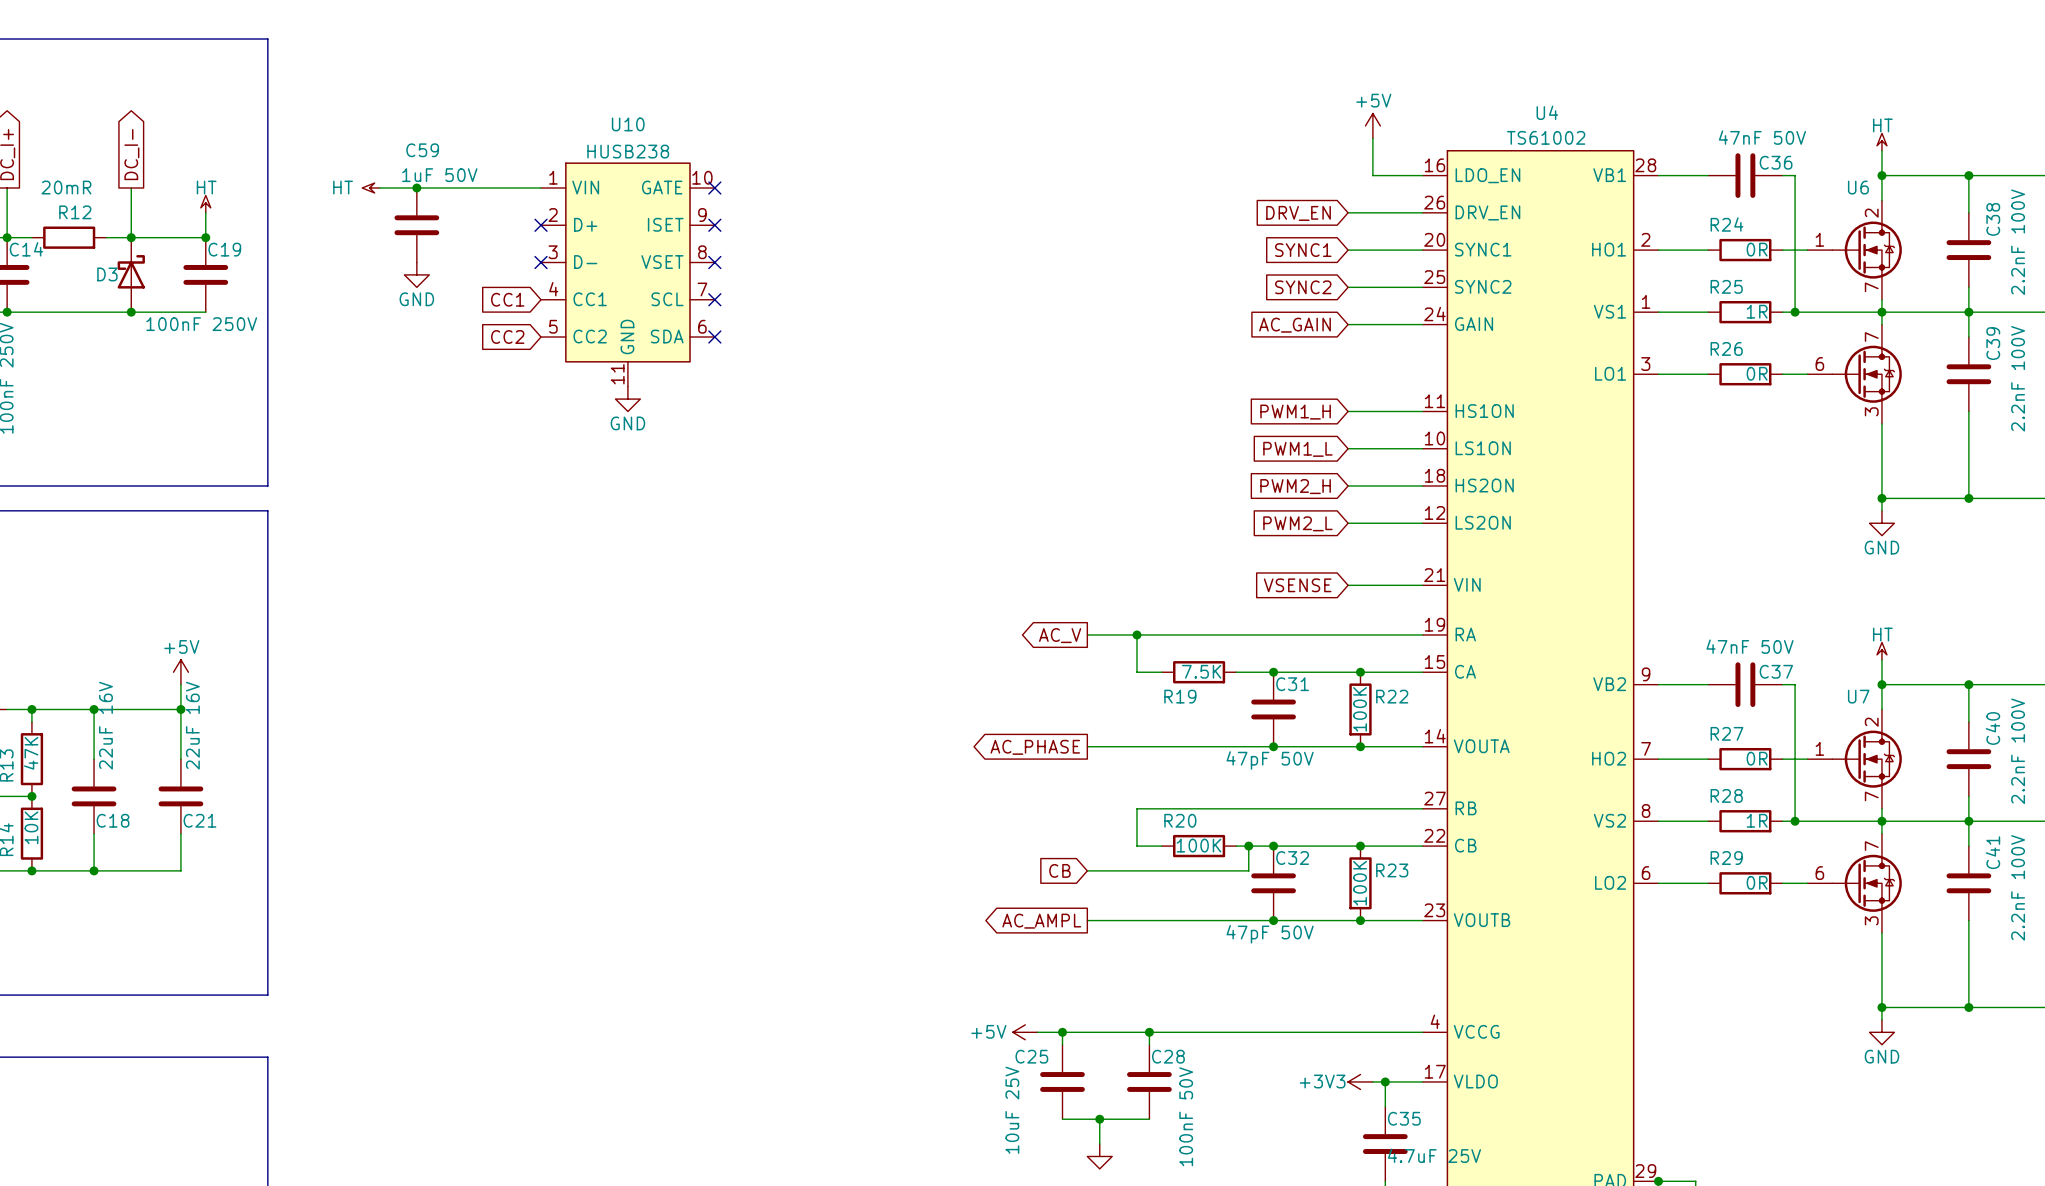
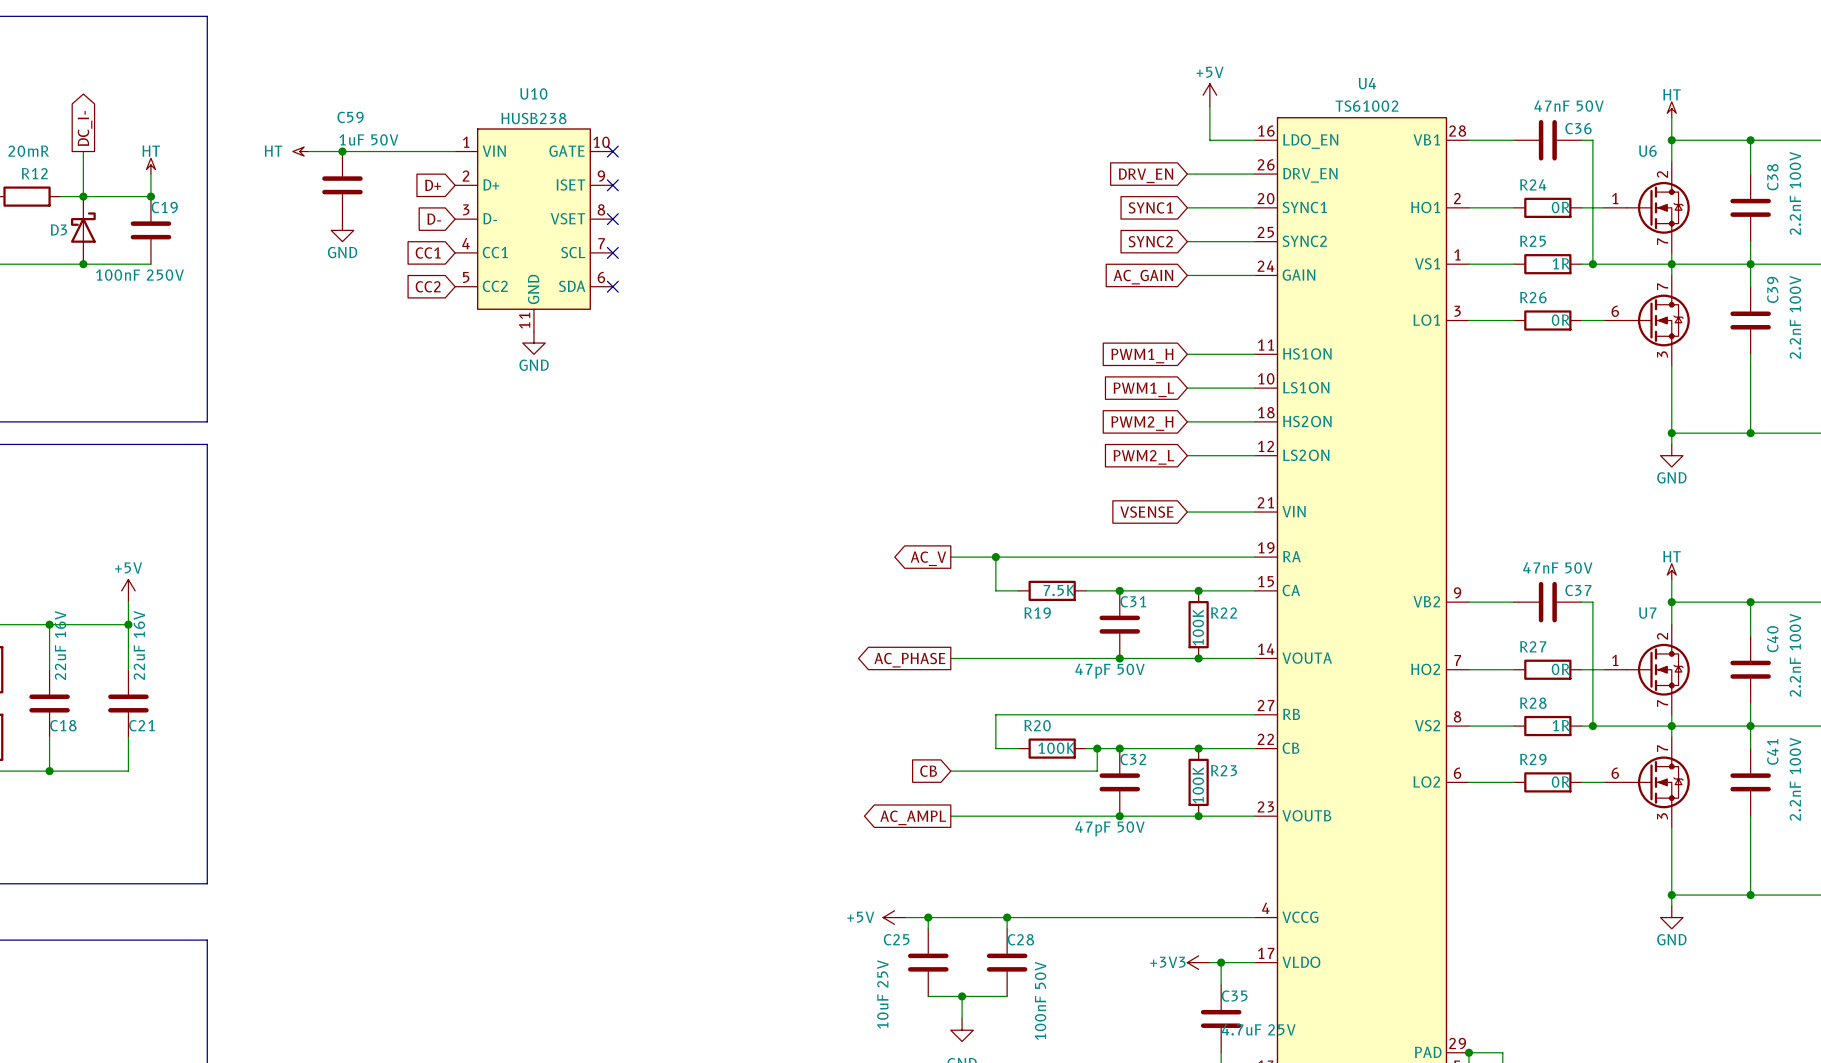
global label: none -> D+ (433, 185)
no-connect mark: (541, 225) -> none
global label: none -> D- (434, 219)
no-connect mark: (541, 262) -> none

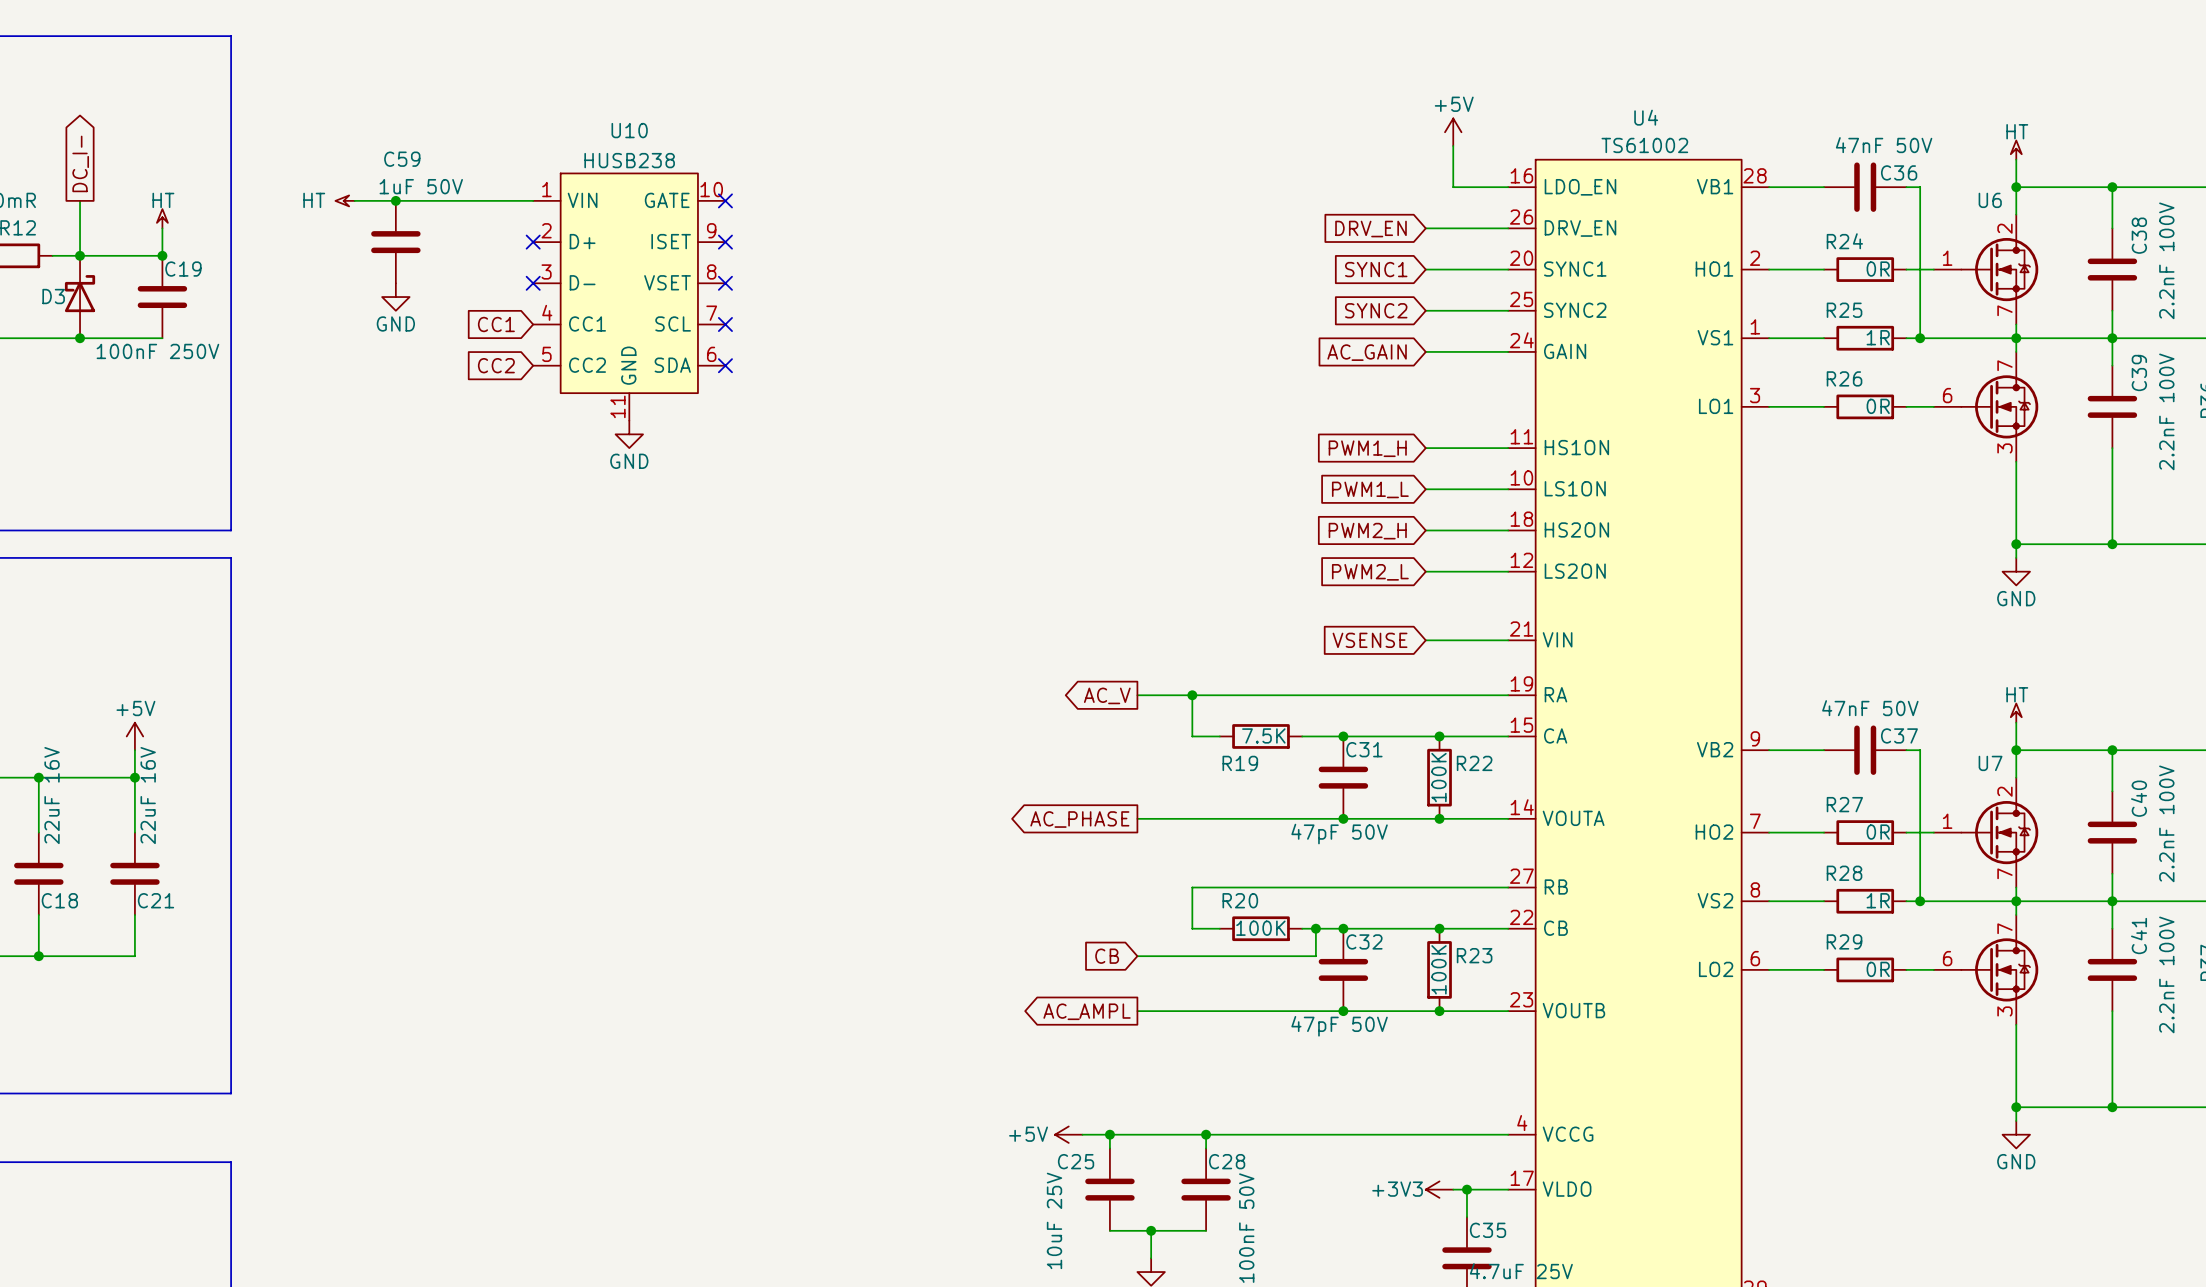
global label: D+ (433, 185) -> none
no-connect mark: none -> (533, 242)
global label: D- (434, 219) -> none
no-connect mark: none -> (533, 283)

